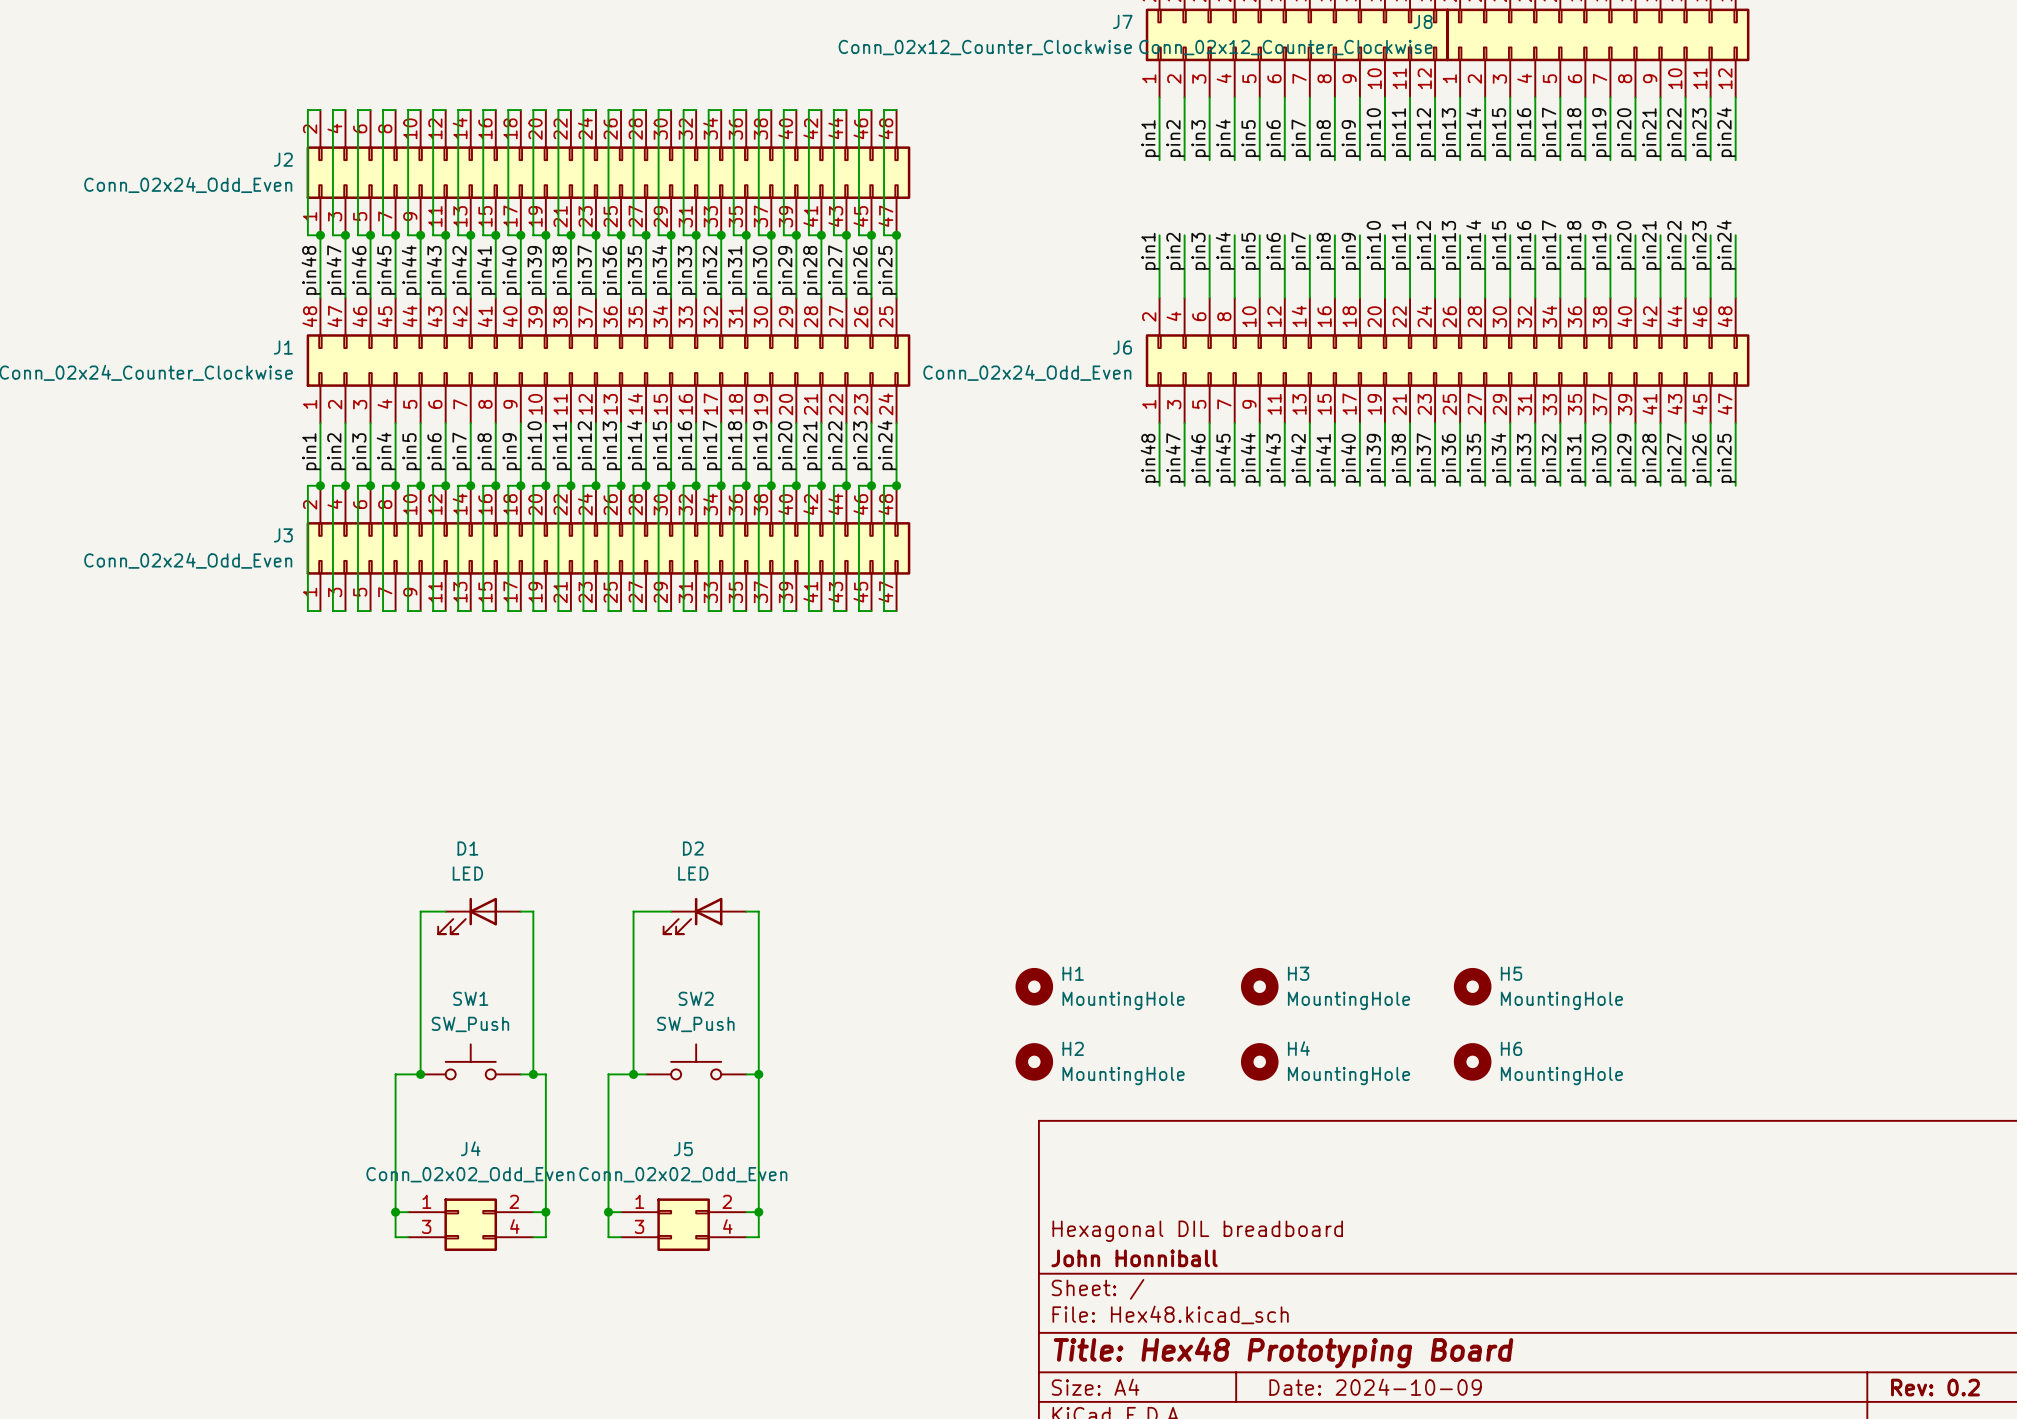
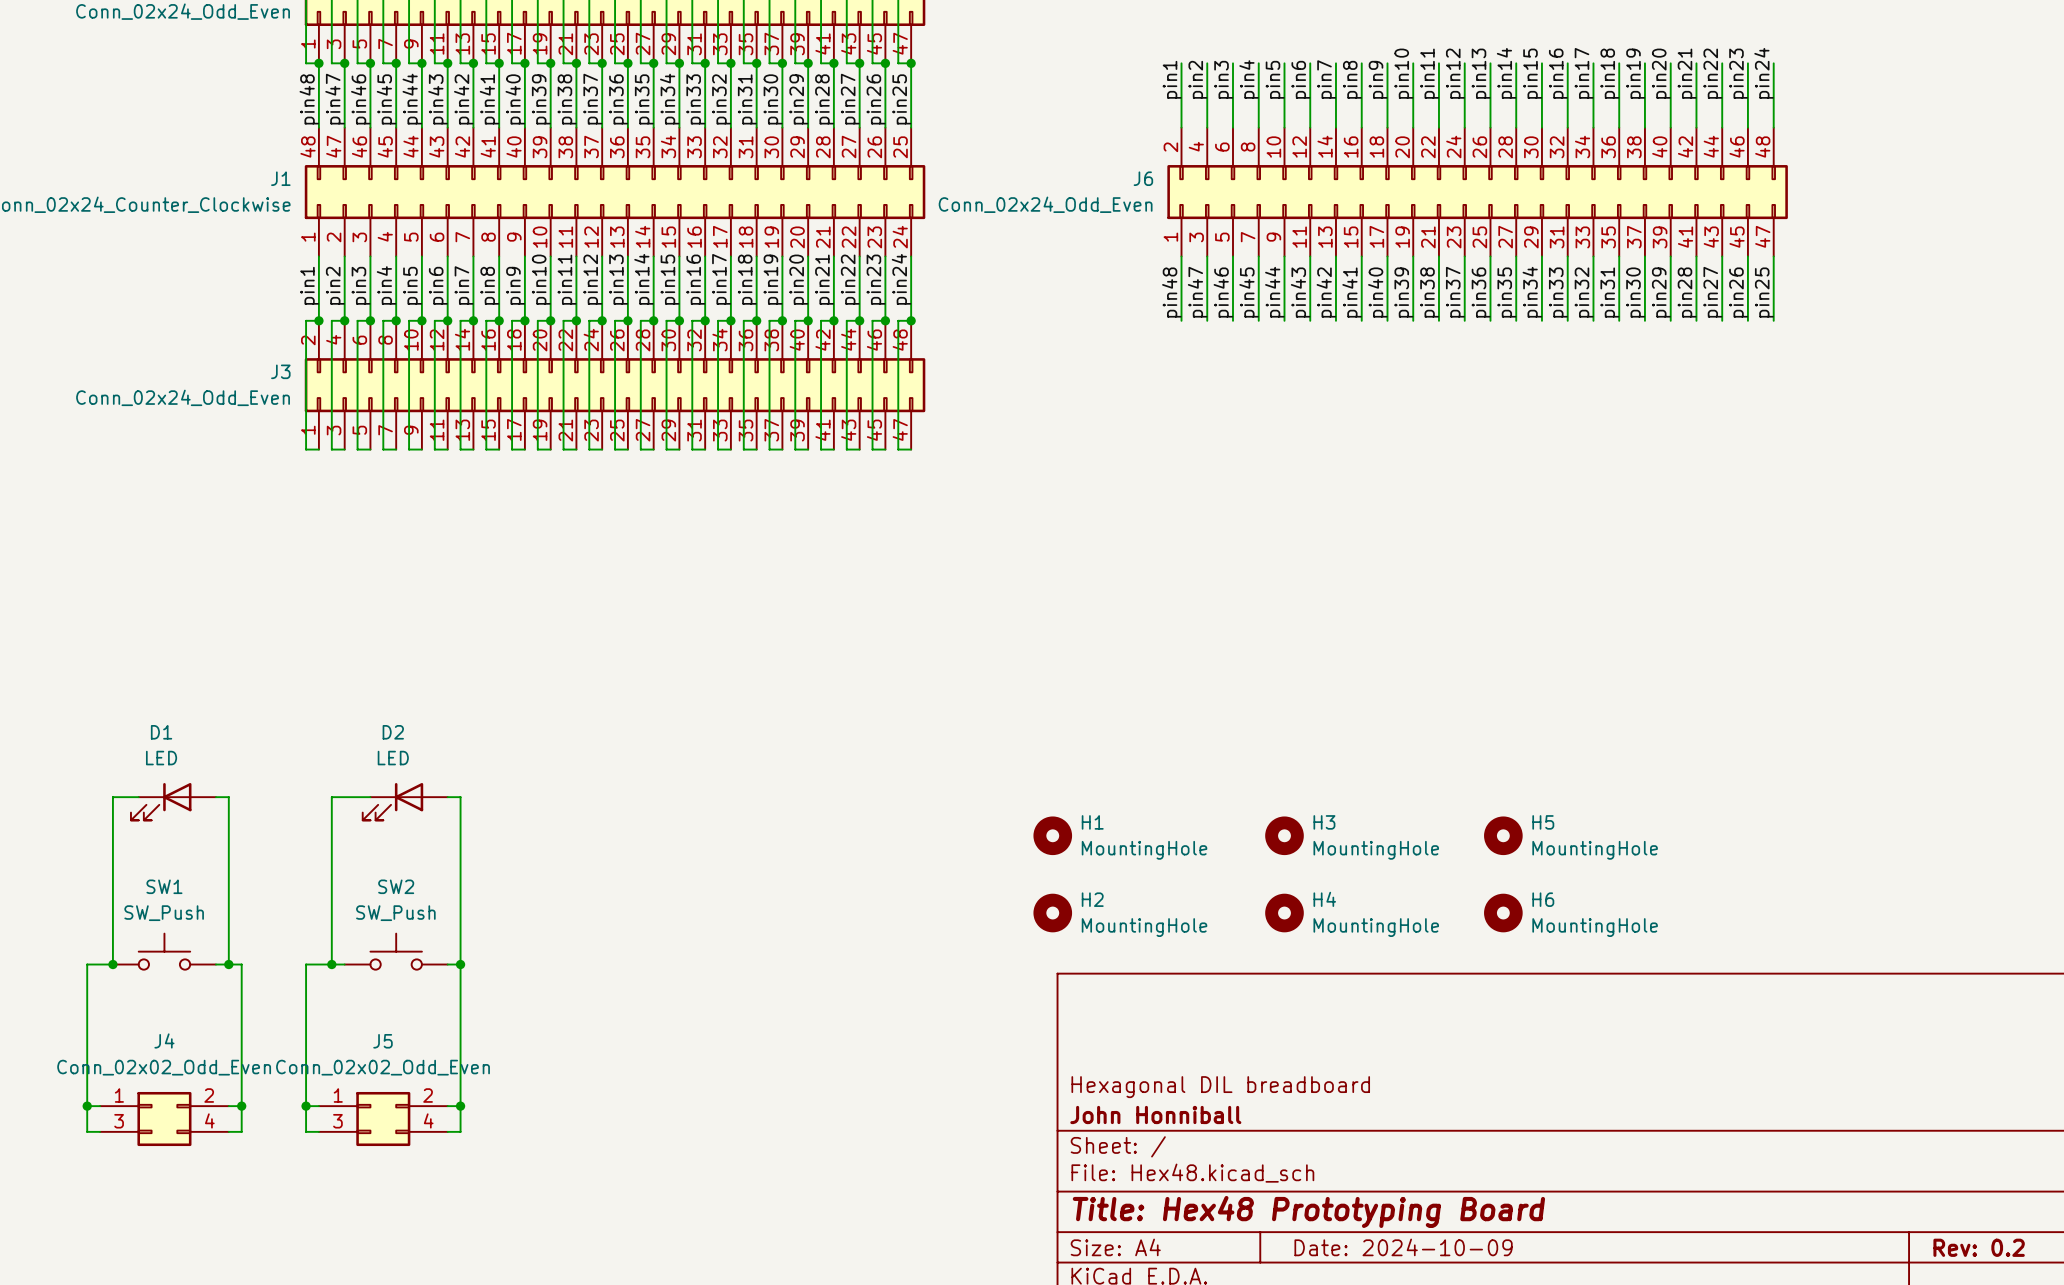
wire: (445, 911) (420, 911) (420, 1074) (395, 1074) (395, 1237) (408, 1237) -> none
wire: (520, 911) (533, 911) (533, 1074) -> none
wire: (671, 911) (633, 911) (633, 1074) -> none
wire: (746, 911) (758, 911) (758, 1237) (746, 1237) -> none
D1 position: (479, 915) -> (173, 801)
D2 position: (704, 915) -> (405, 801)
wire: none -> (138, 797) (112, 797) (112, 964) (87, 964) (87, 1131) (100, 1131)
wire: none -> (215, 797) (228, 797) (228, 964)
wire: none -> (370, 797) (331, 797) (331, 964)
wire: none -> (447, 797) (460, 797) (460, 1131) (447, 1131)
SW1 position: (470, 1061) -> (164, 951)
SW2 position: (696, 1061) -> (396, 951)
junction: (420, 1074) -> none
wire: (520, 1074) (545, 1074) (545, 1237) (533, 1237) -> none
junction: (533, 1074) -> none
junction: (633, 1074) -> none
wire: (646, 1074) (608, 1074) (608, 1237) (621, 1237) -> none
wire: (746, 1074) (758, 1074) -> none
junction: (758, 1074) -> none
junction: none -> (112, 964)
wire: none -> (215, 964) (241, 964) (241, 1131) (228, 1131)
junction: none -> (228, 964)
junction: none -> (331, 964)
wire: none -> (344, 964) (306, 964) (306, 1131) (318, 1131)
junction: none -> (460, 964)
wire: (395, 1212) (408, 1212) -> (306, 1106) (318, 1106)
junction: (395, 1212) -> none
junction: (545, 1212) -> none
wire: (608, 1212) (621, 1212) -> (447, 964) (460, 964)
junction: (608, 1212) -> none
wire: (746, 1212) (758, 1212) -> none
junction: (758, 1212) -> none
J4 position: (470, 1224) -> (164, 1119)
J5 position: (683, 1224) -> (383, 1119)
wire: none -> (87, 1106) (100, 1106)
junction: none -> (87, 1106)
wire: none -> (228, 1106) (241, 1106)
junction: none -> (241, 1106)
junction: none -> (306, 1106)
junction: none -> (460, 1106)

